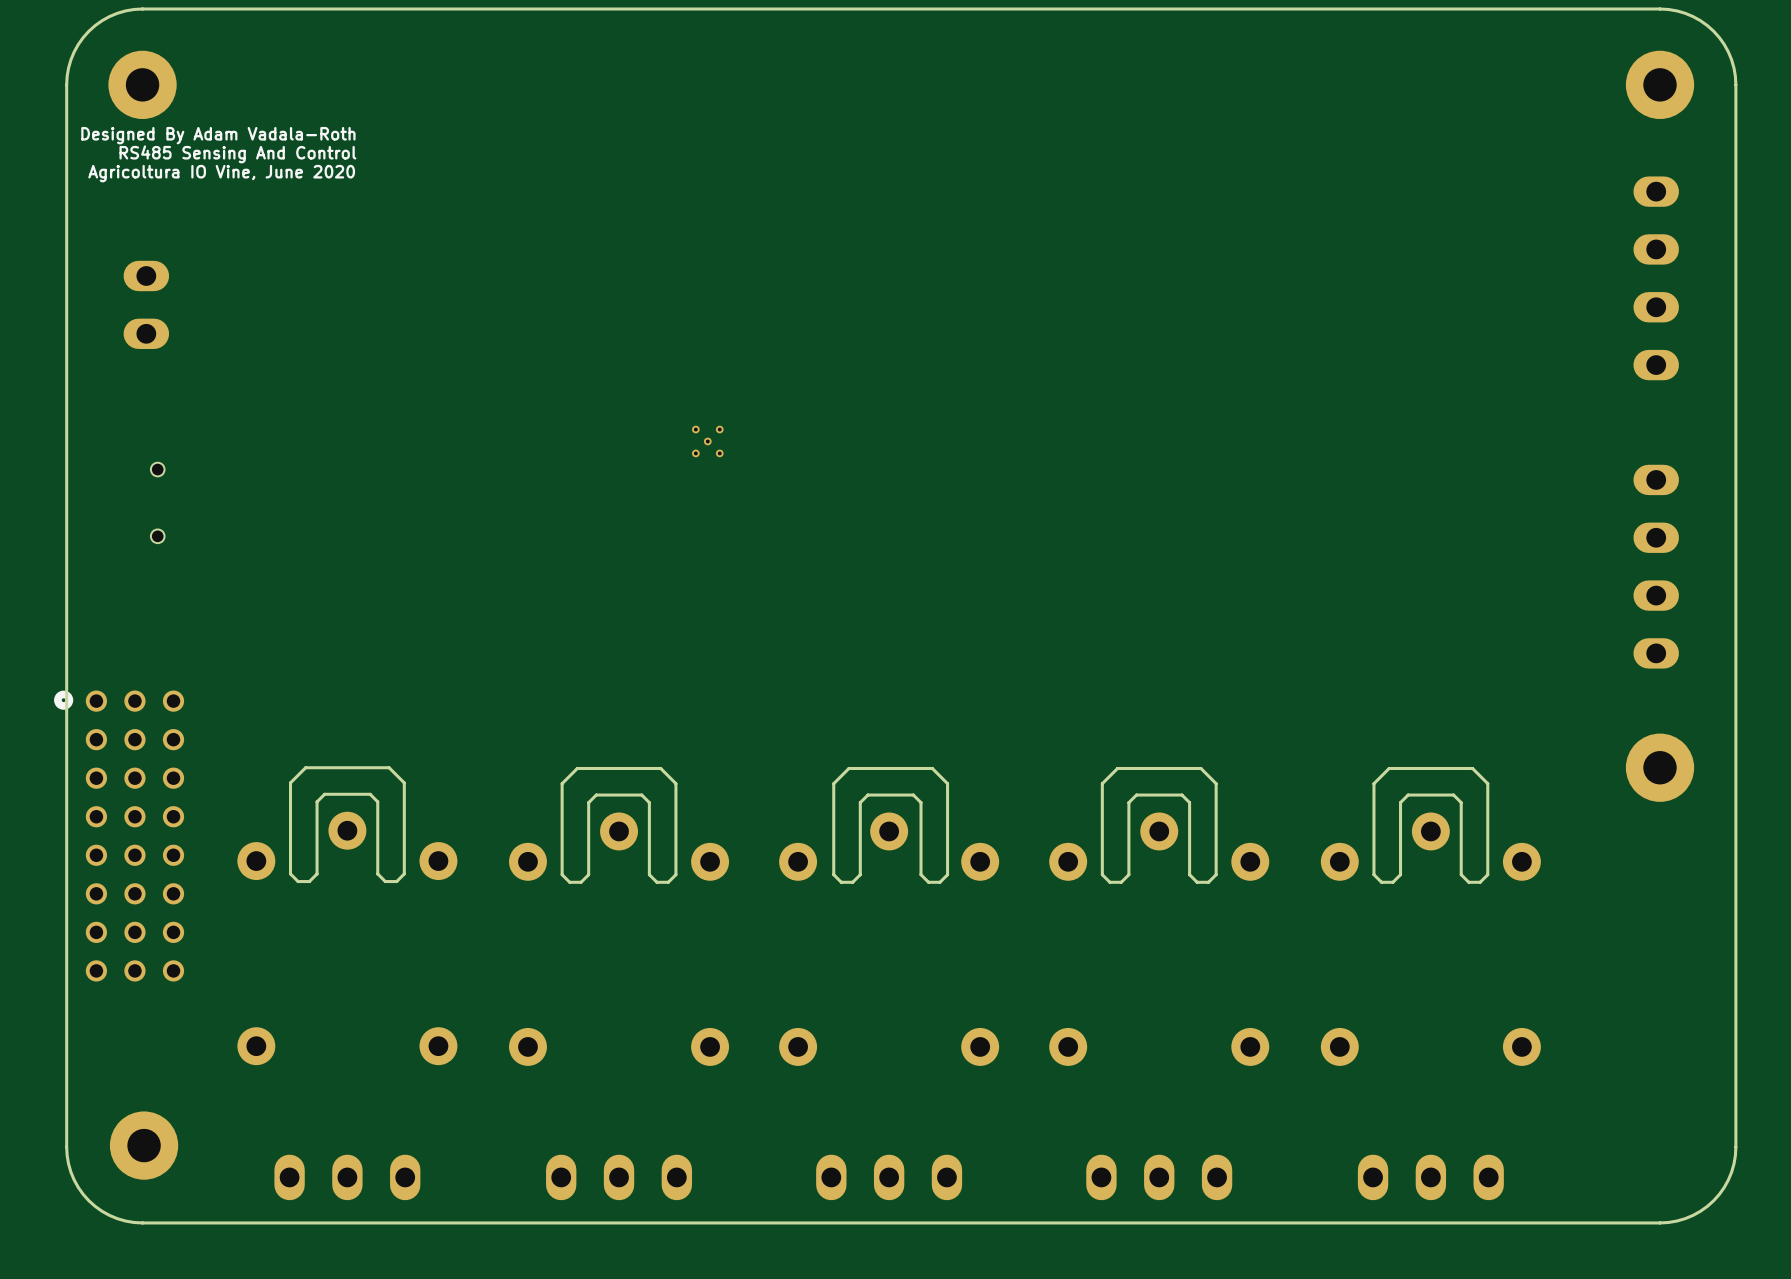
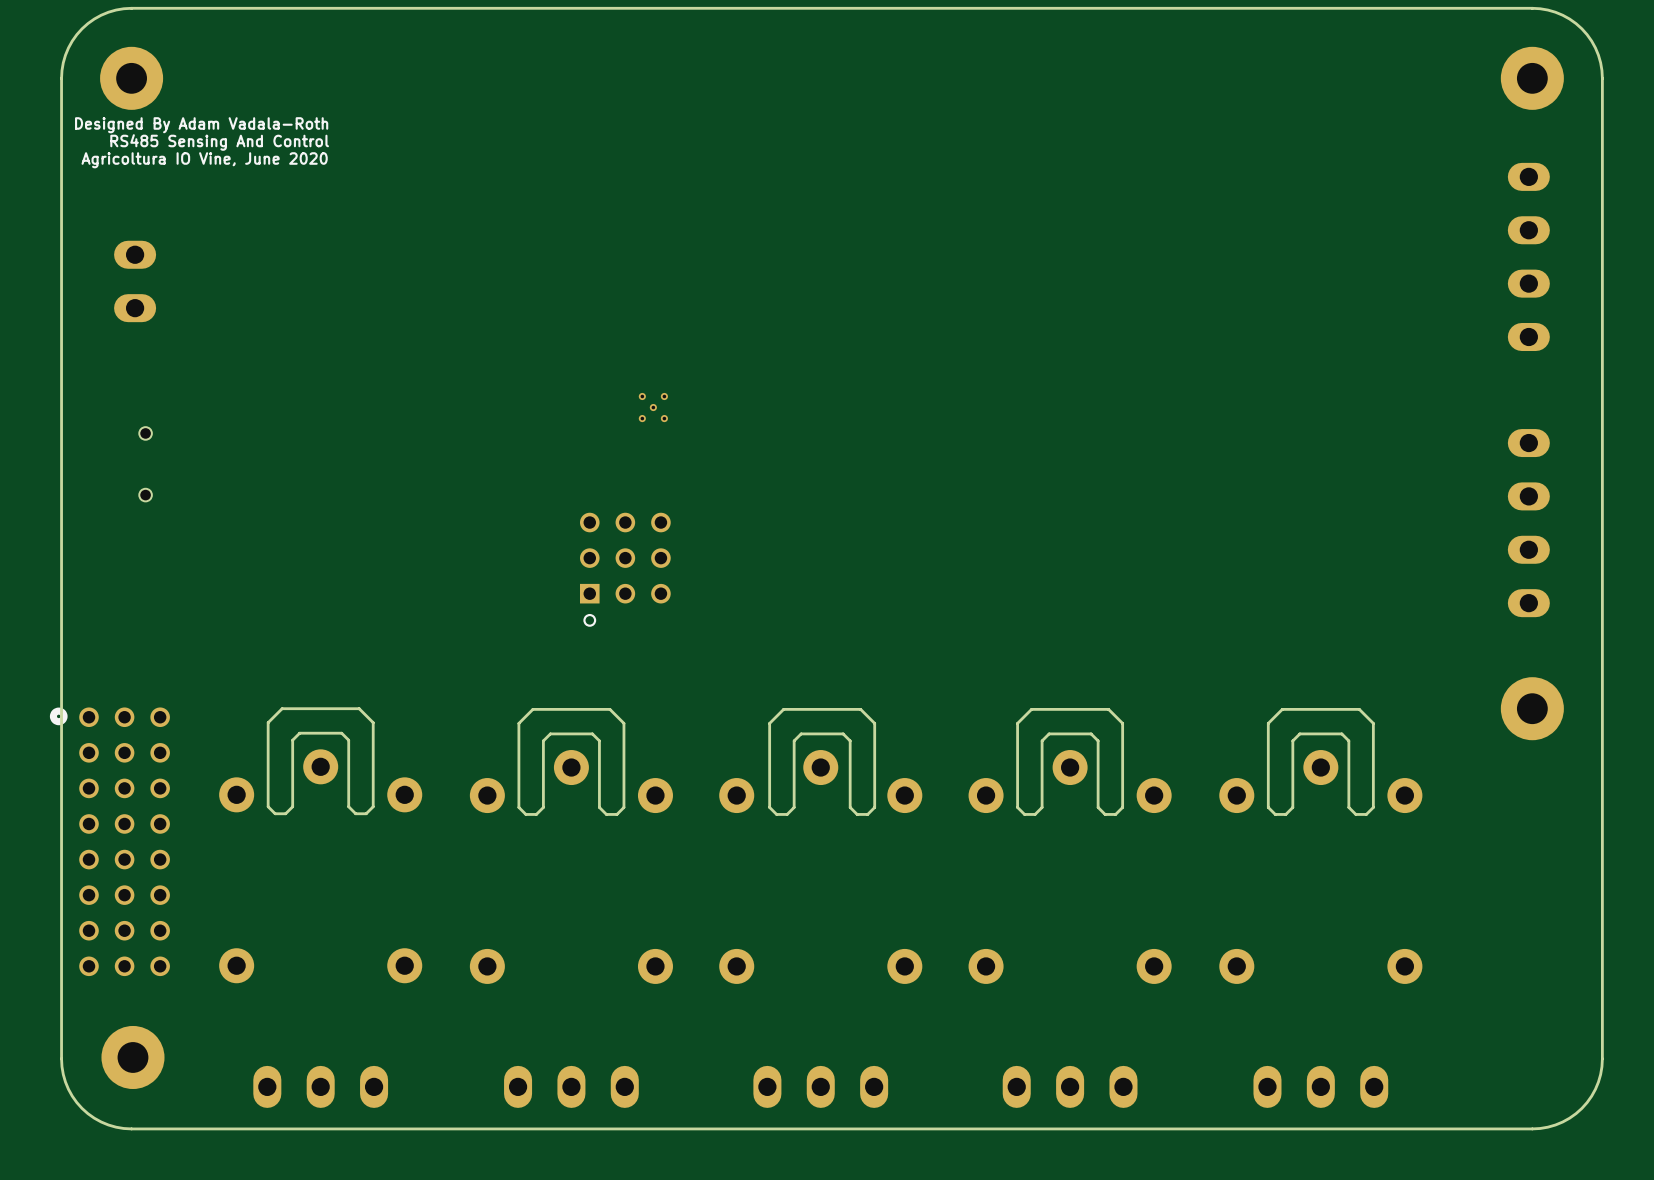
part: none -> (625, 569)
part position: (119, 836) -> (109, 841)

